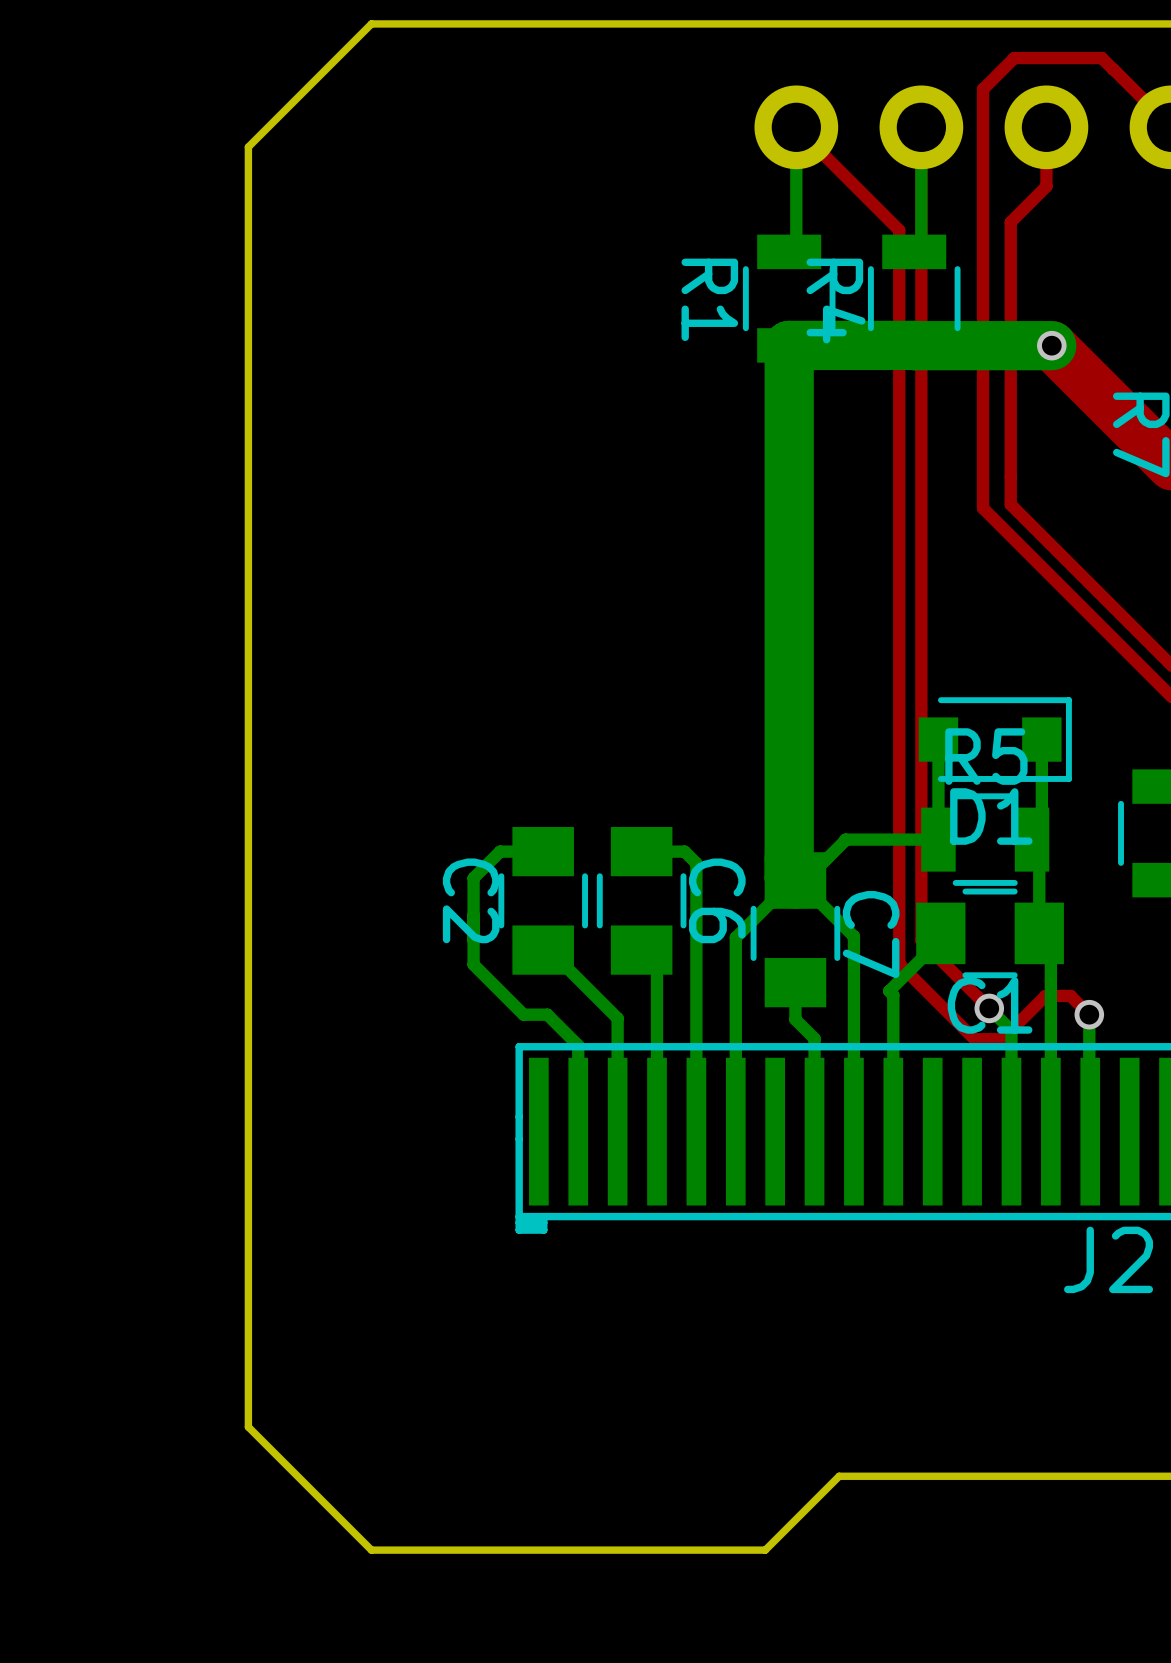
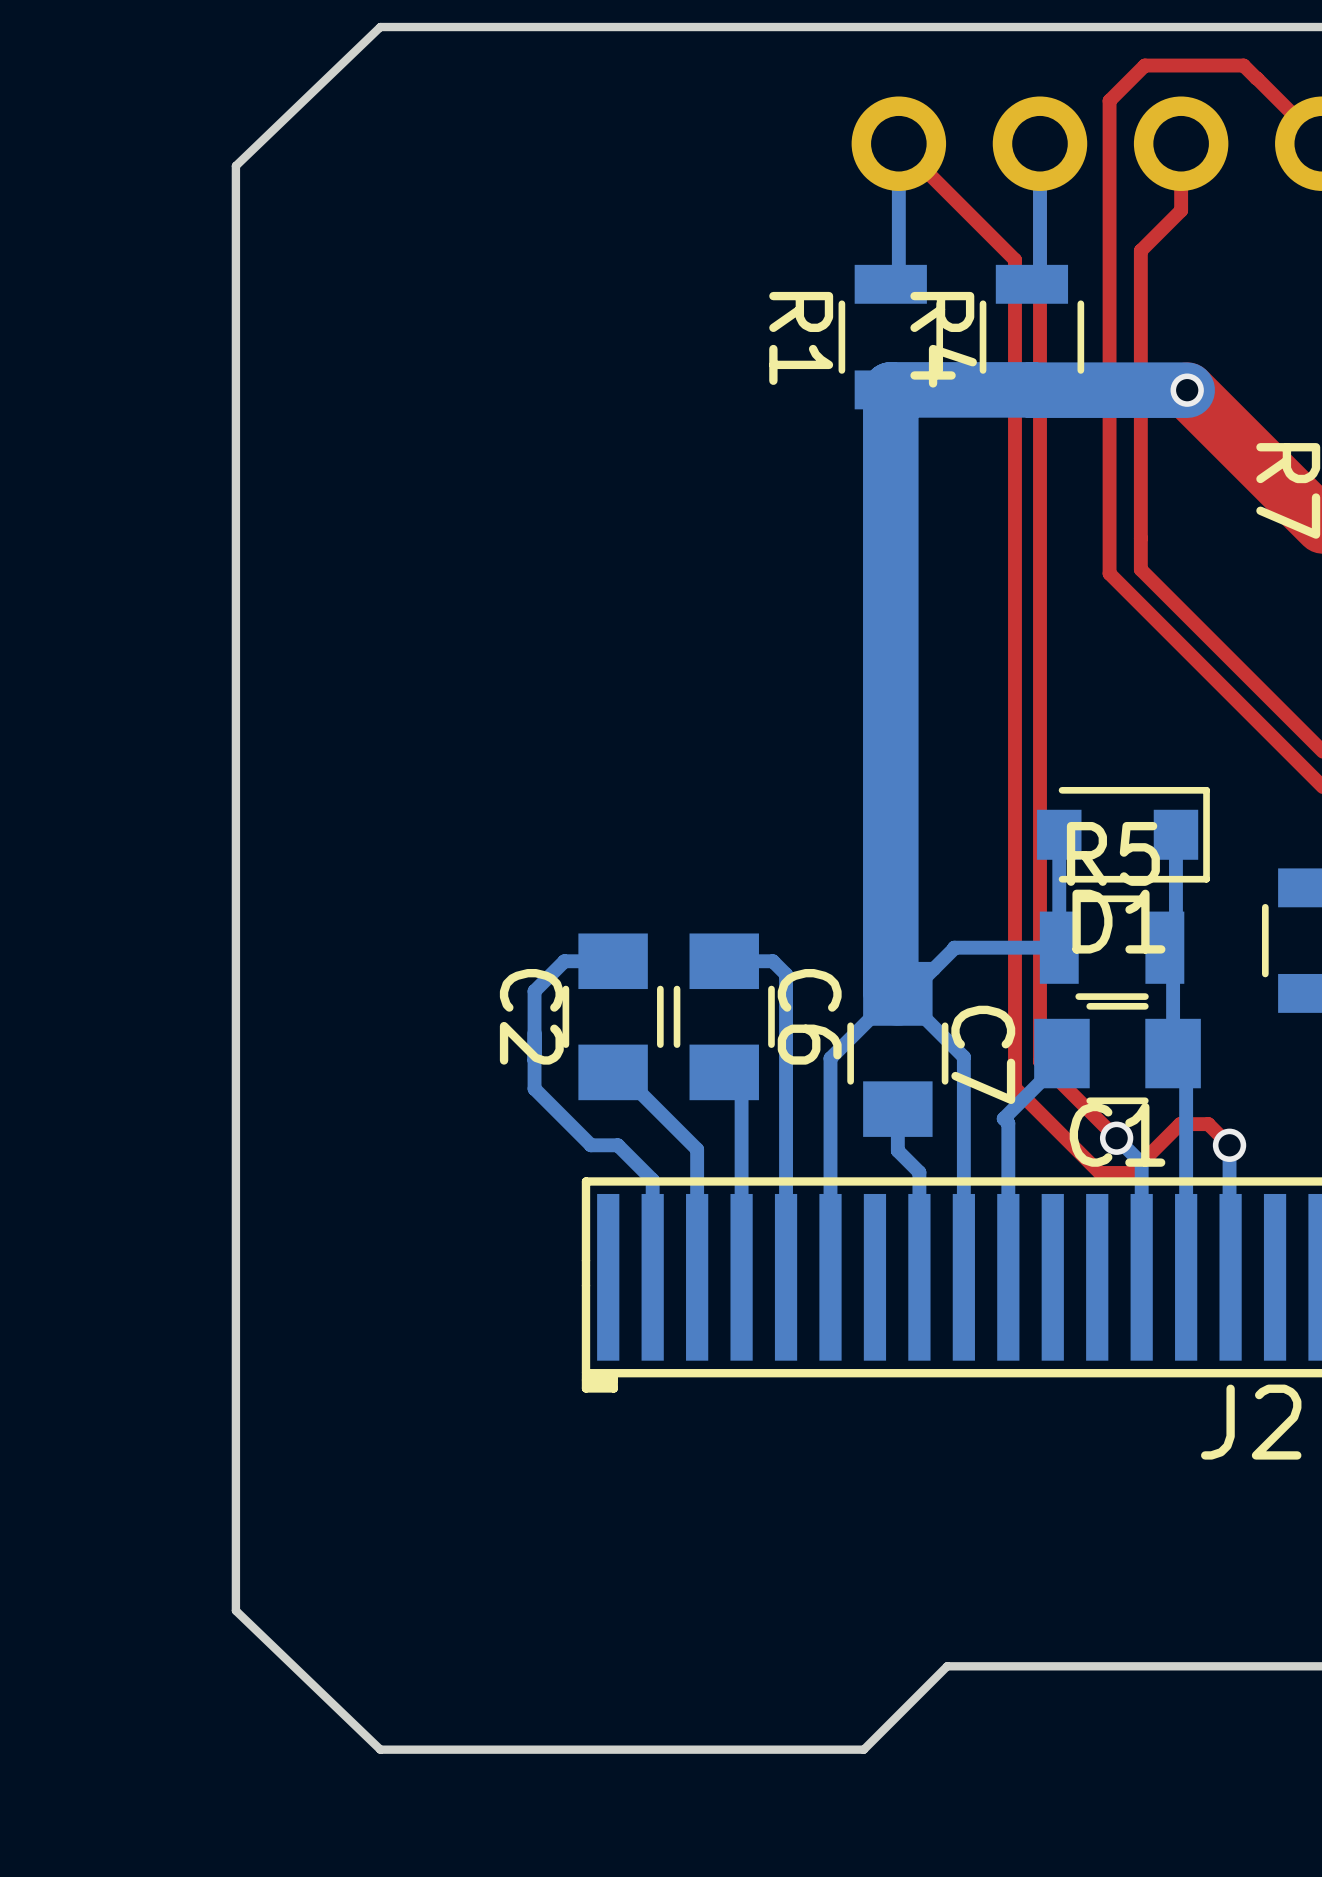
board edge: (371, 23) (248, 147) (248, 1427) (371, 1550) -> (419, 27) (380, 27) (235, 165) (235, 1610) (380, 1749) (419, 1749)

